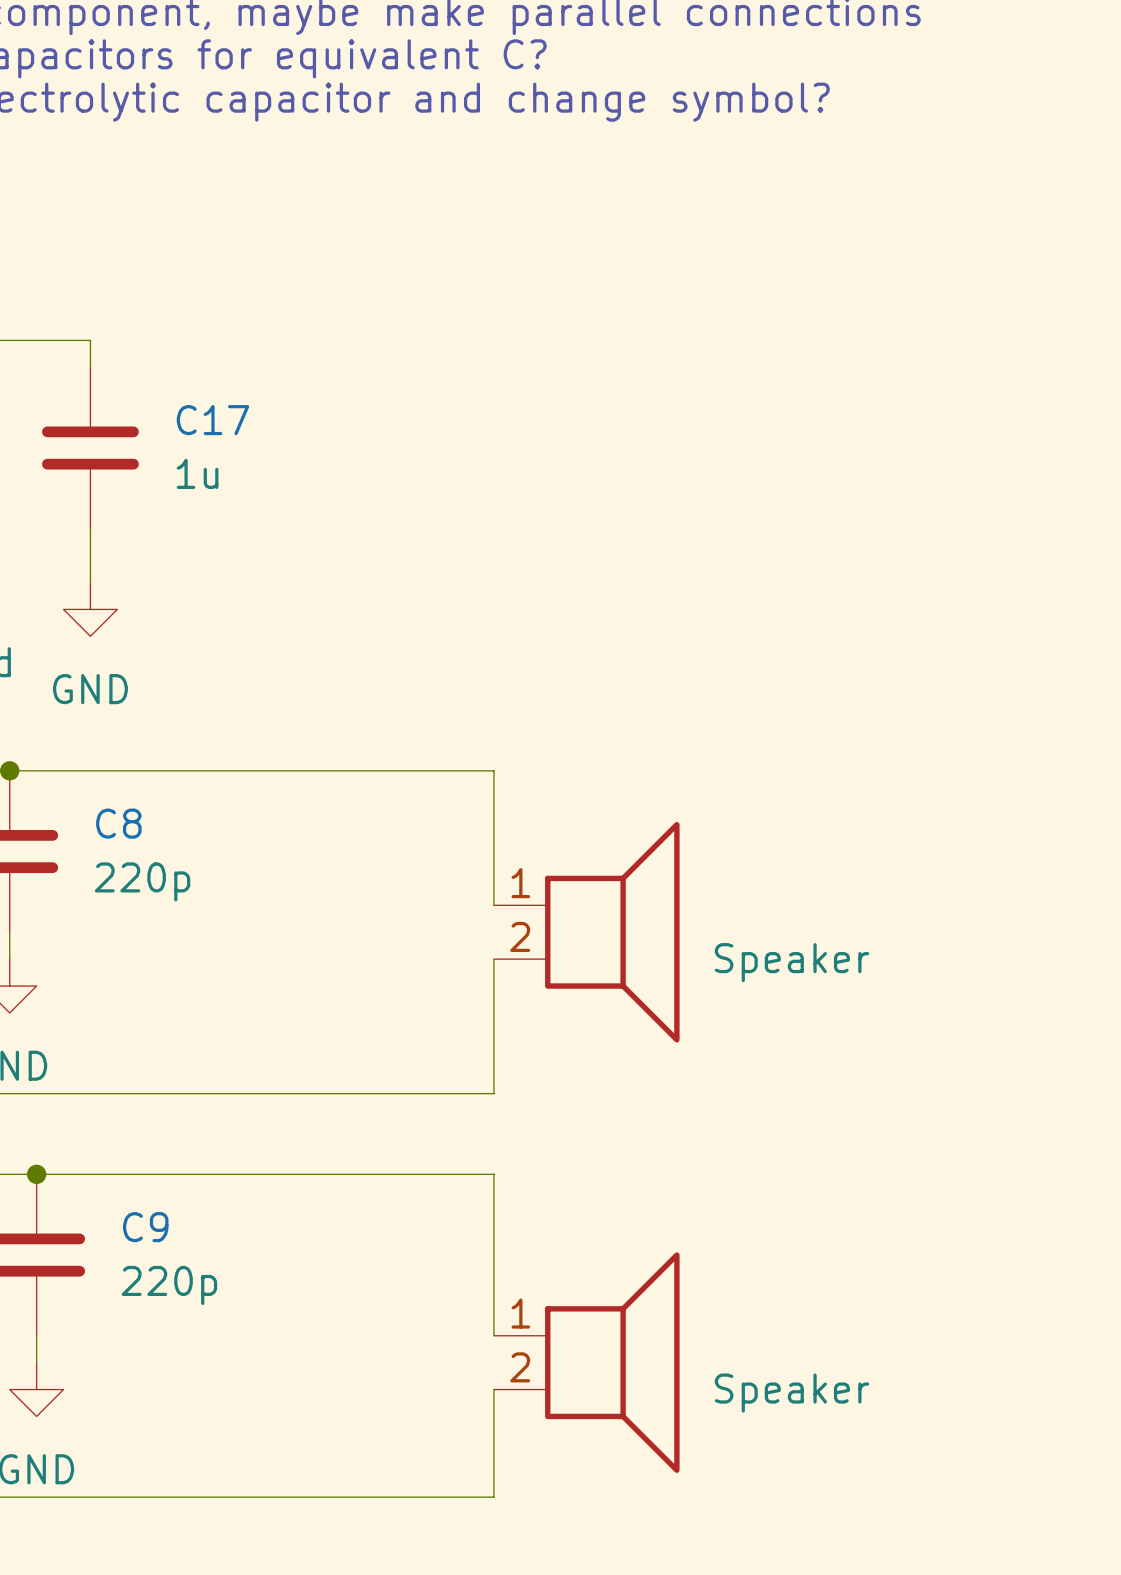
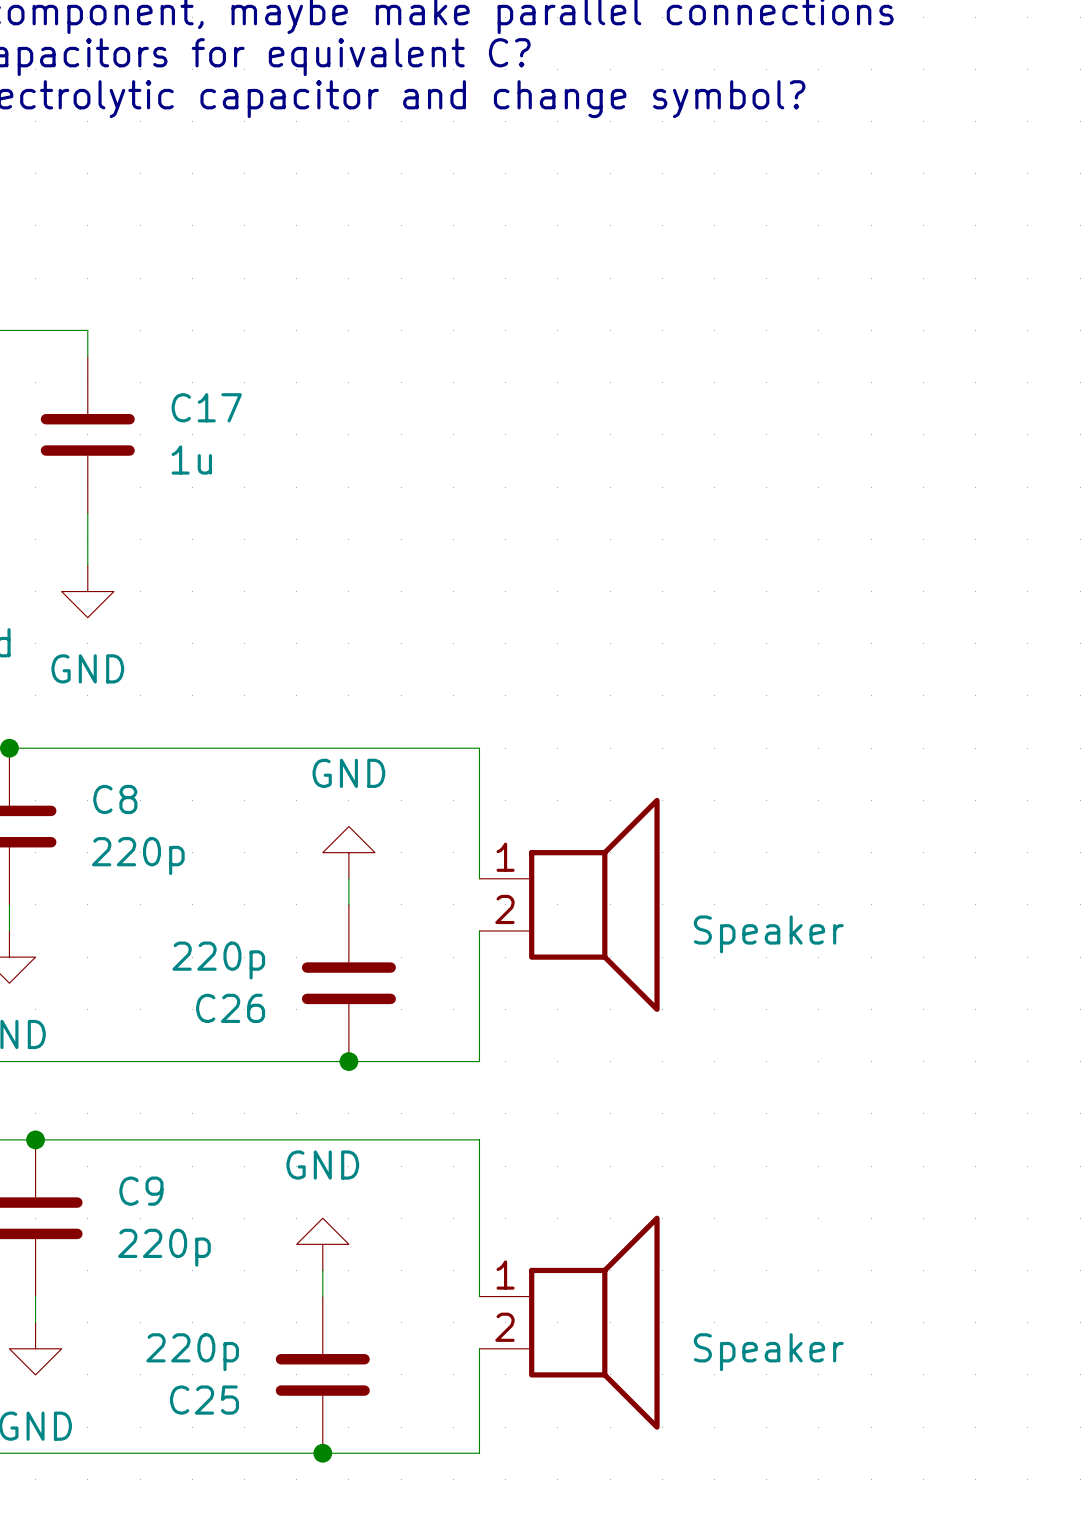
power symbol: none -> GND (348, 852)
wire: none -> (348, 878) (348, 904)
C26: none -> 220p (348, 983)
junction: none -> (348, 1061)
power symbol: none -> GND (322, 1244)
wire: none -> (322, 1270) (322, 1296)
C25: none -> 220p (322, 1374)
junction: none -> (322, 1453)

